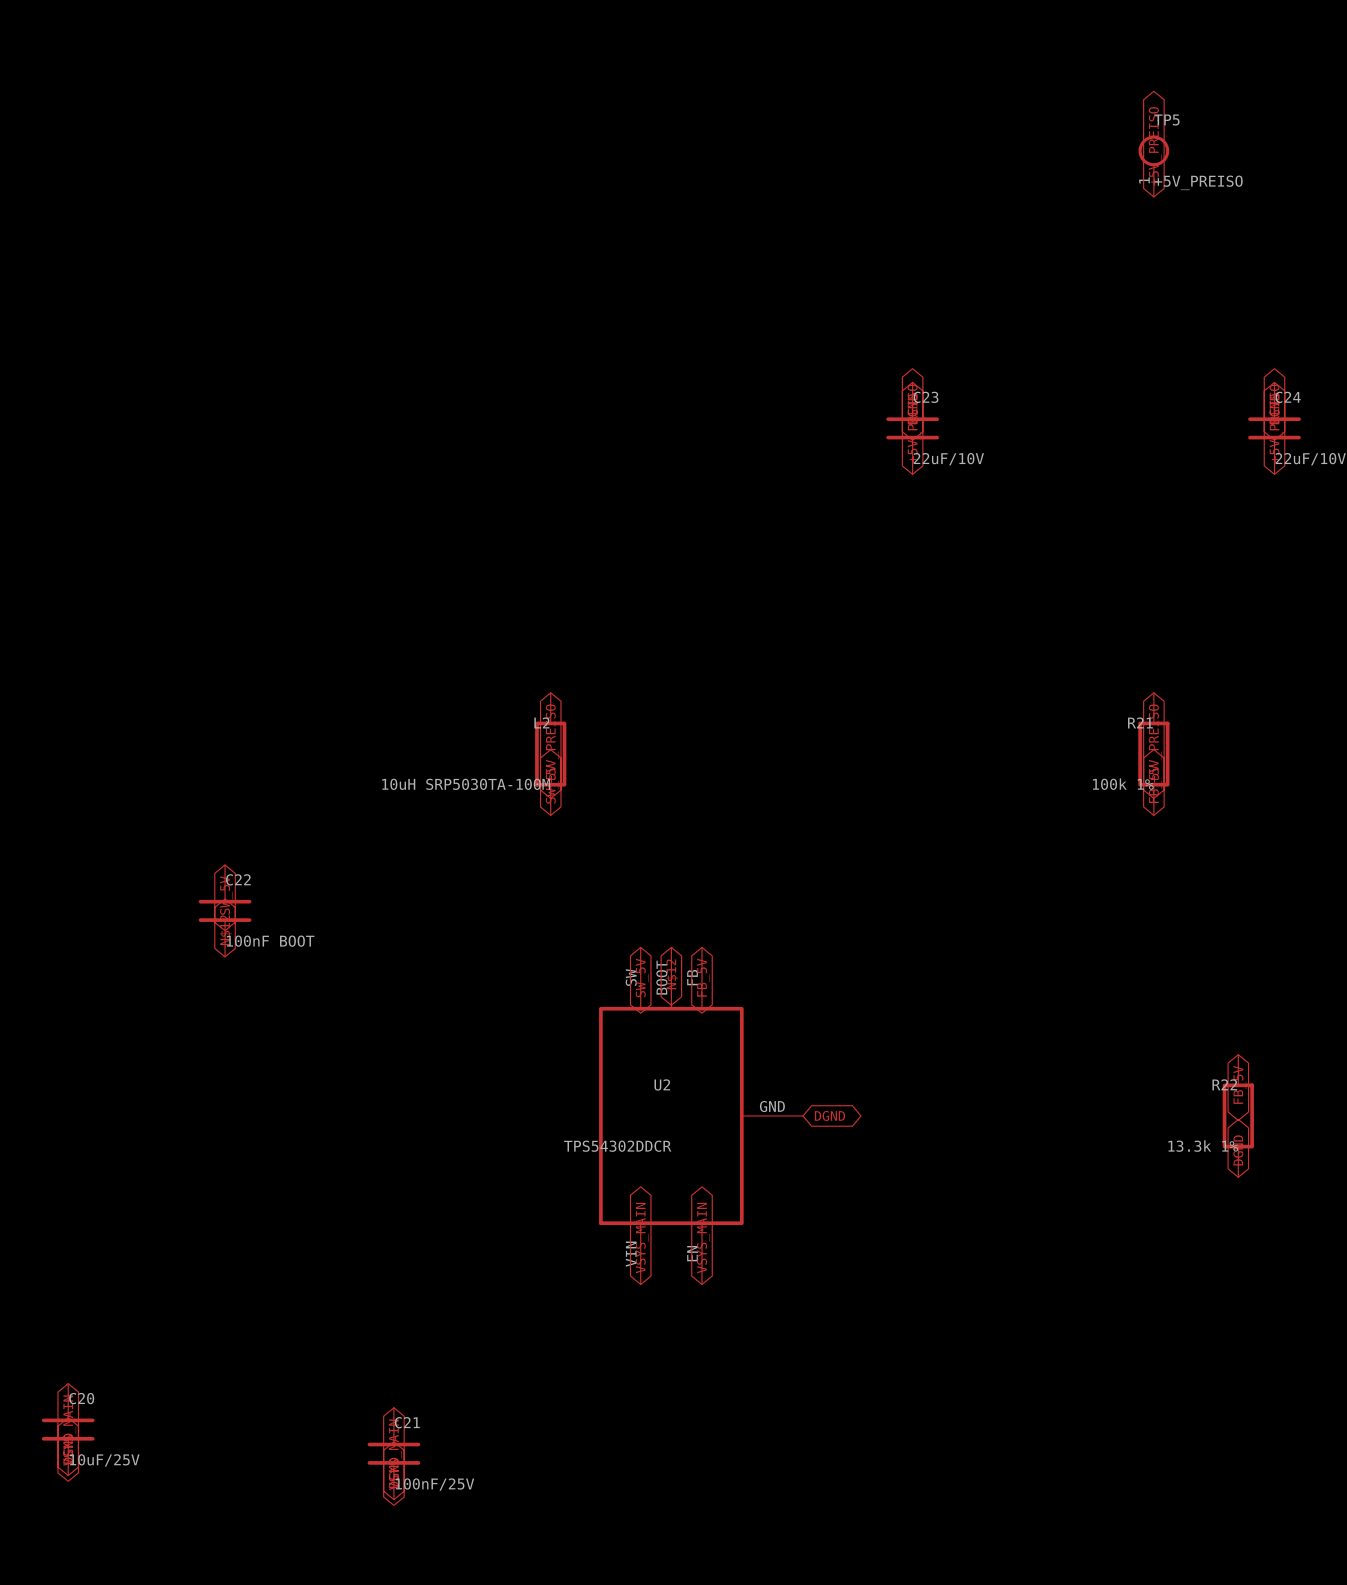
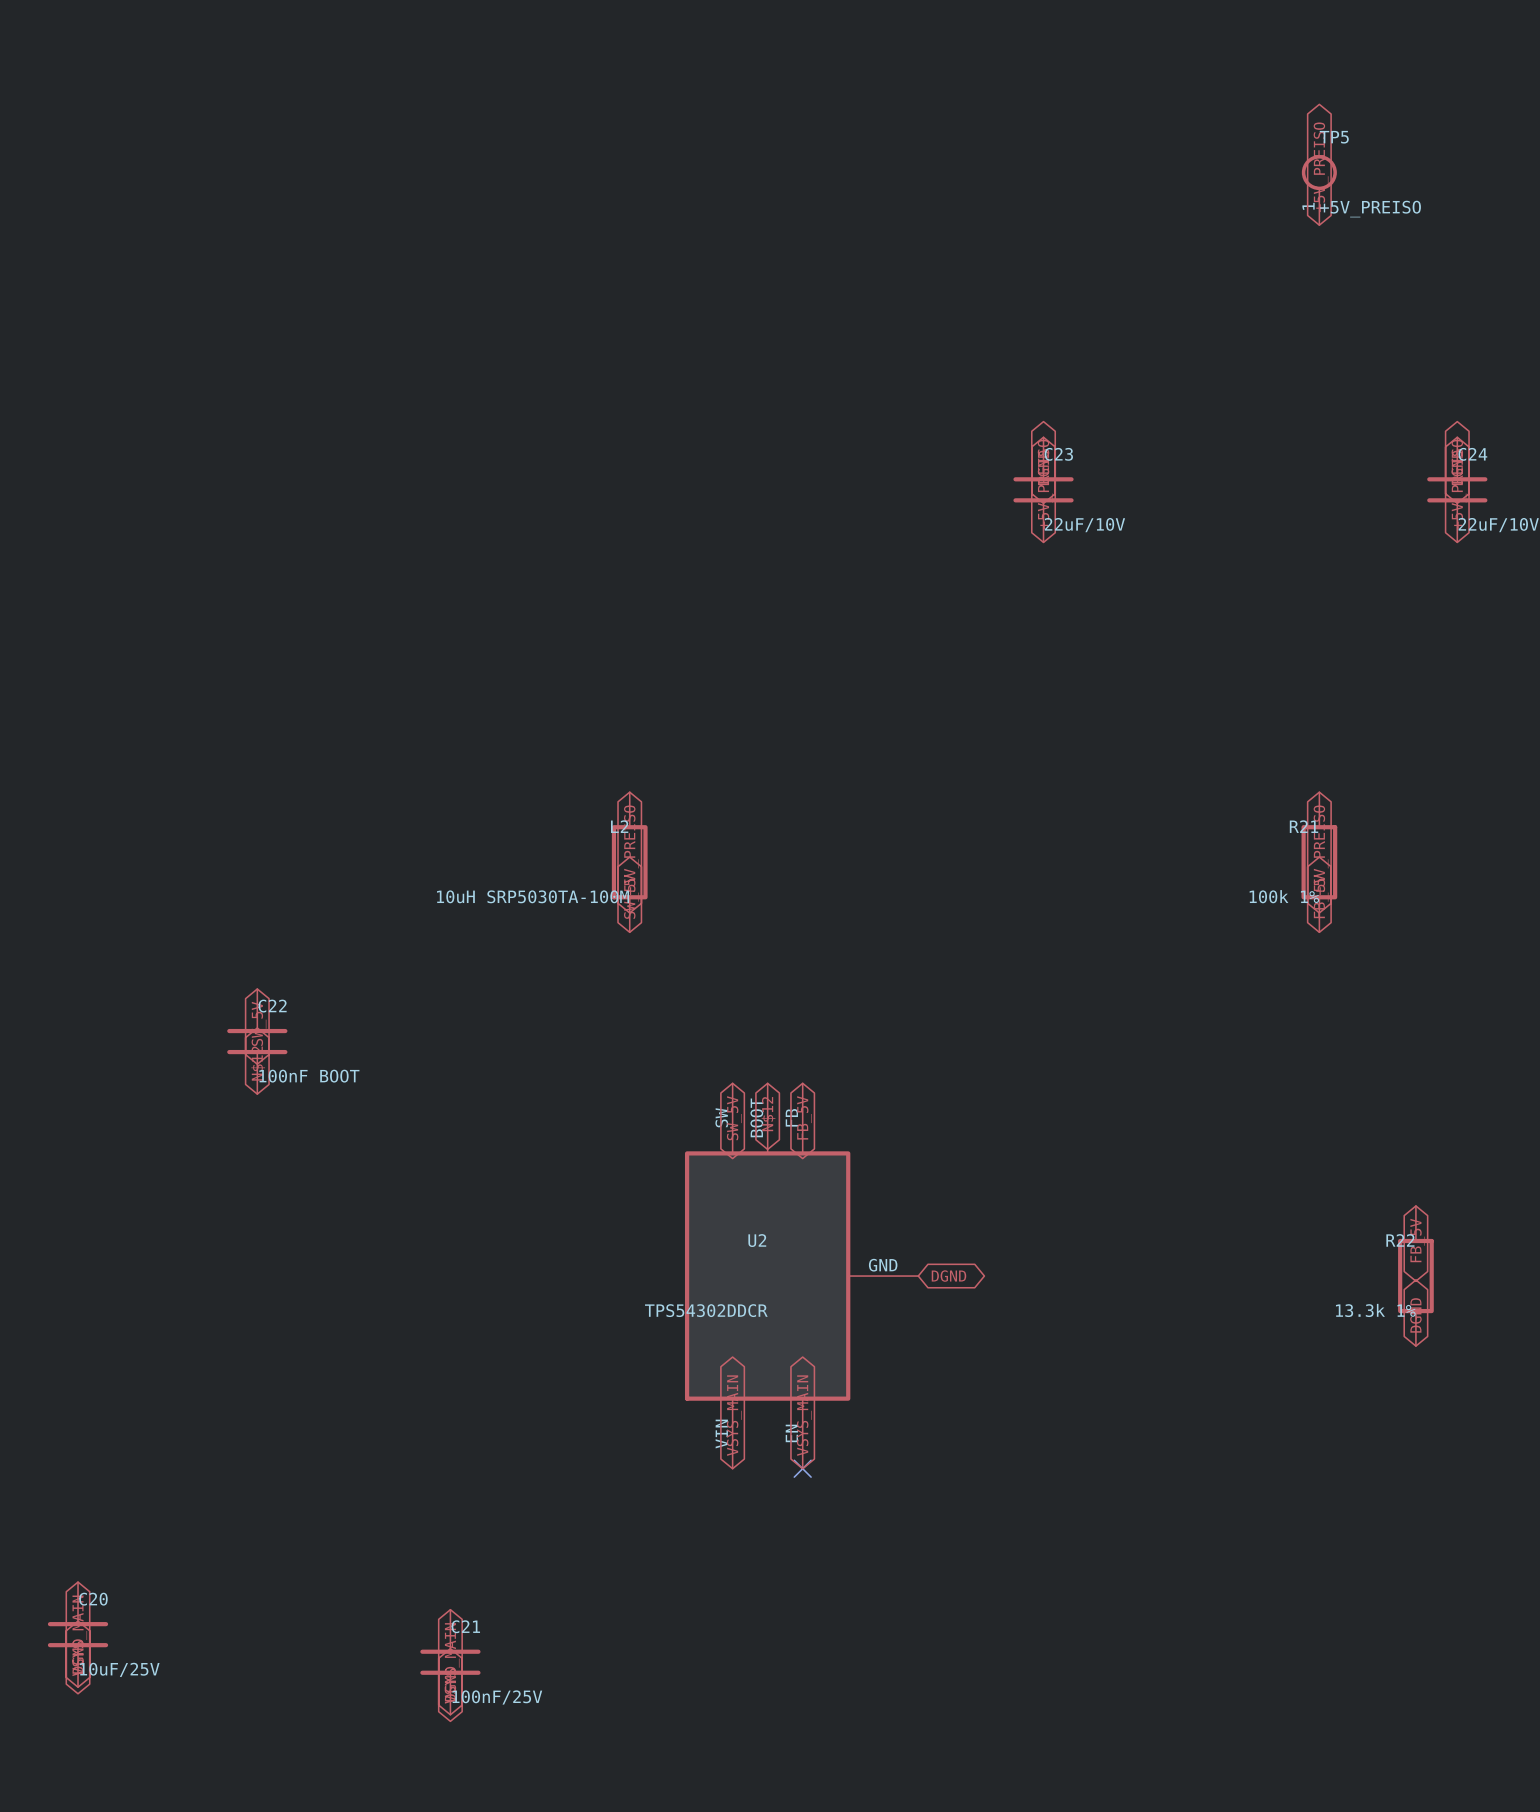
no-connect mark: none -> (802, 1468)

